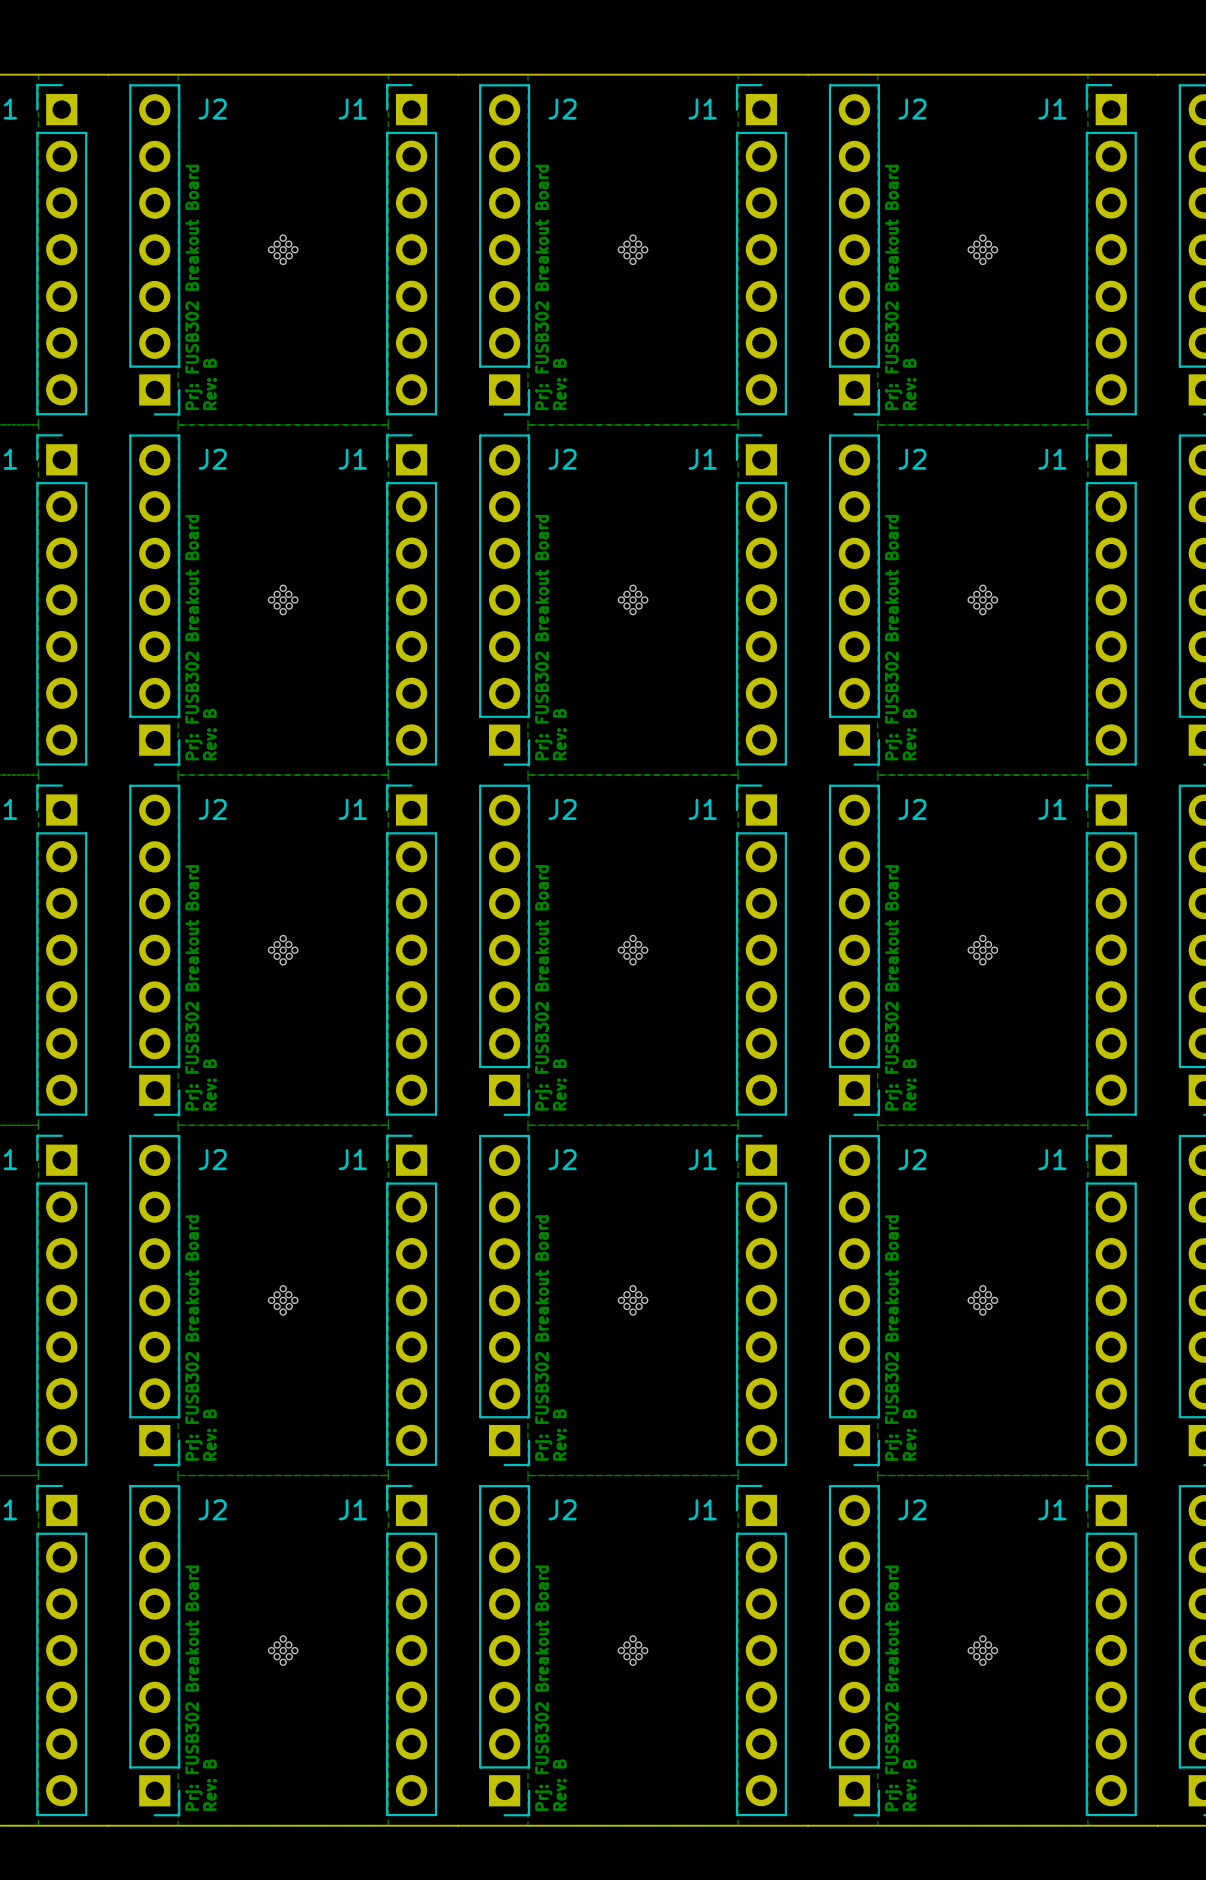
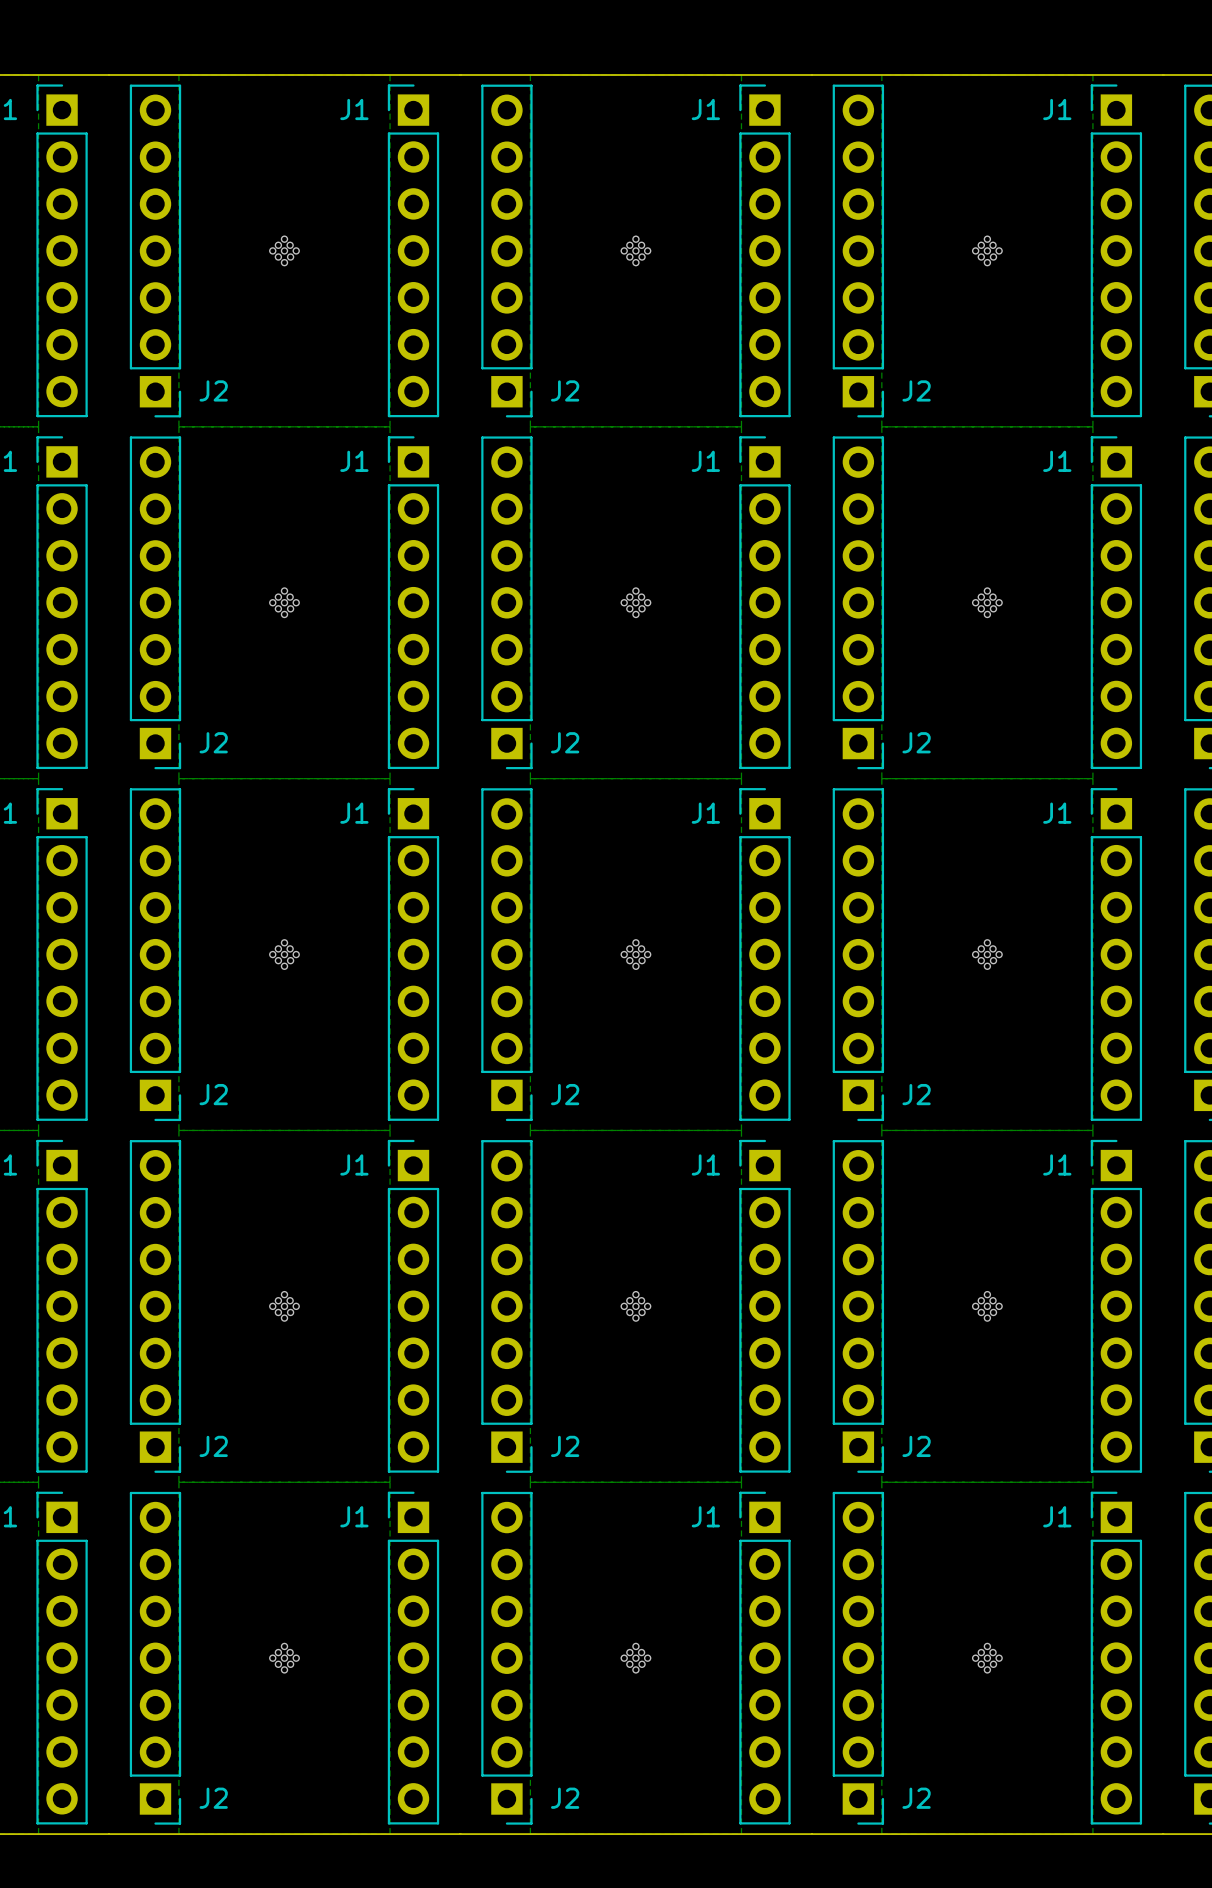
J2 name position: J2 (212, 108) -> J2 (213, 390)
J2 name position: J2 (562, 108) -> J2 (565, 390)
J2 name position: J2 (912, 108) -> J2 (916, 390)
text: Prj: FUSB302 Breakout Board (194, 287) -> none
text: Prj: FUSB302 Breakout Board (543, 287) -> none
text: Prj: FUSB302 Breakout Board (893, 287) -> none
text: Rev: B (209, 384) -> none
text: Rev: B (559, 384) -> none
text: Rev: B (909, 384) -> none
J2 name position: J2 (212, 459) -> J2 (213, 742)
J2 name position: J2 (562, 459) -> J2 (565, 742)
J2 name position: J2 (912, 459) -> J2 (916, 742)
text: Prj: FUSB302 Breakout Board (194, 637) -> none
text: Prj: FUSB302 Breakout Board (543, 637) -> none
text: Prj: FUSB302 Breakout Board (893, 637) -> none
text: Rev: B (209, 734) -> none
text: Rev: B (559, 734) -> none
text: Rev: B (909, 734) -> none
J2 name position: J2 (212, 809) -> J2 (213, 1094)
J2 name position: J2 (562, 809) -> J2 (565, 1094)
J2 name position: J2 (912, 809) -> J2 (916, 1094)
text: Prj: FUSB302 Breakout Board (194, 987) -> none
text: Prj: FUSB302 Breakout Board (543, 987) -> none
text: Prj: FUSB302 Breakout Board (893, 987) -> none
text: Rev: B (209, 1084) -> none
text: Rev: B (559, 1084) -> none
text: Rev: B (909, 1084) -> none
J2 name position: J2 (212, 1159) -> J2 (213, 1446)
J2 name position: J2 (562, 1159) -> J2 (565, 1446)
J2 name position: J2 (912, 1159) -> J2 (916, 1446)
text: Prj: FUSB302 Breakout Board (194, 1338) -> none
text: Prj: FUSB302 Breakout Board (543, 1338) -> none
text: Prj: FUSB302 Breakout Board (893, 1338) -> none
text: Rev: B (209, 1434) -> none
text: Rev: B (559, 1434) -> none
text: Rev: B (909, 1434) -> none
J2 name position: J2 (212, 1509) -> J2 (213, 1798)
J2 name position: J2 (562, 1509) -> J2 (565, 1798)
J2 name position: J2 (912, 1509) -> J2 (916, 1798)
text: Prj: FUSB302 Breakout Board (194, 1688) -> none
text: Prj: FUSB302 Breakout Board (543, 1688) -> none
text: Prj: FUSB302 Breakout Board (893, 1688) -> none
text: Rev: B (209, 1785) -> none
text: Rev: B (559, 1785) -> none
text: Rev: B (909, 1785) -> none

